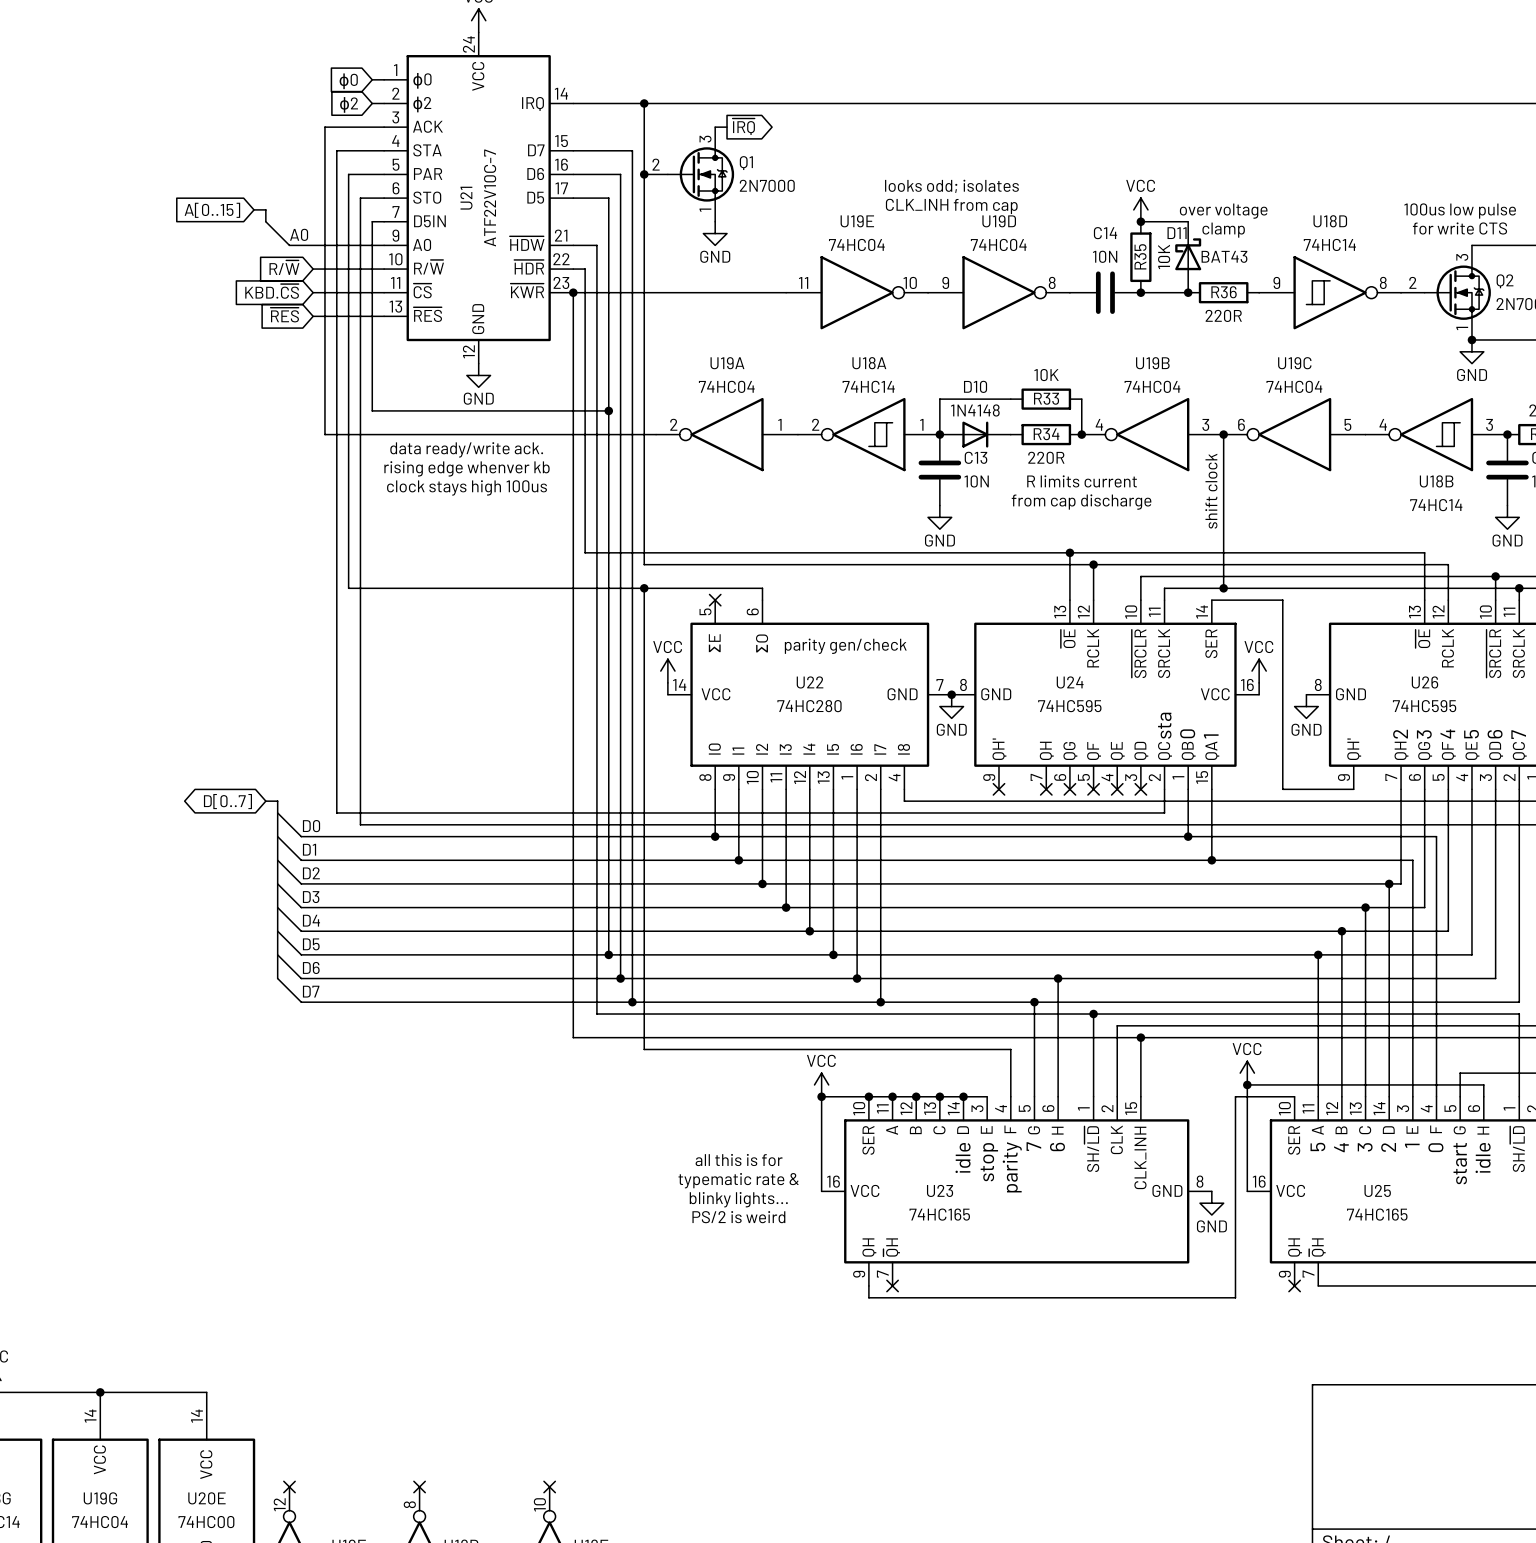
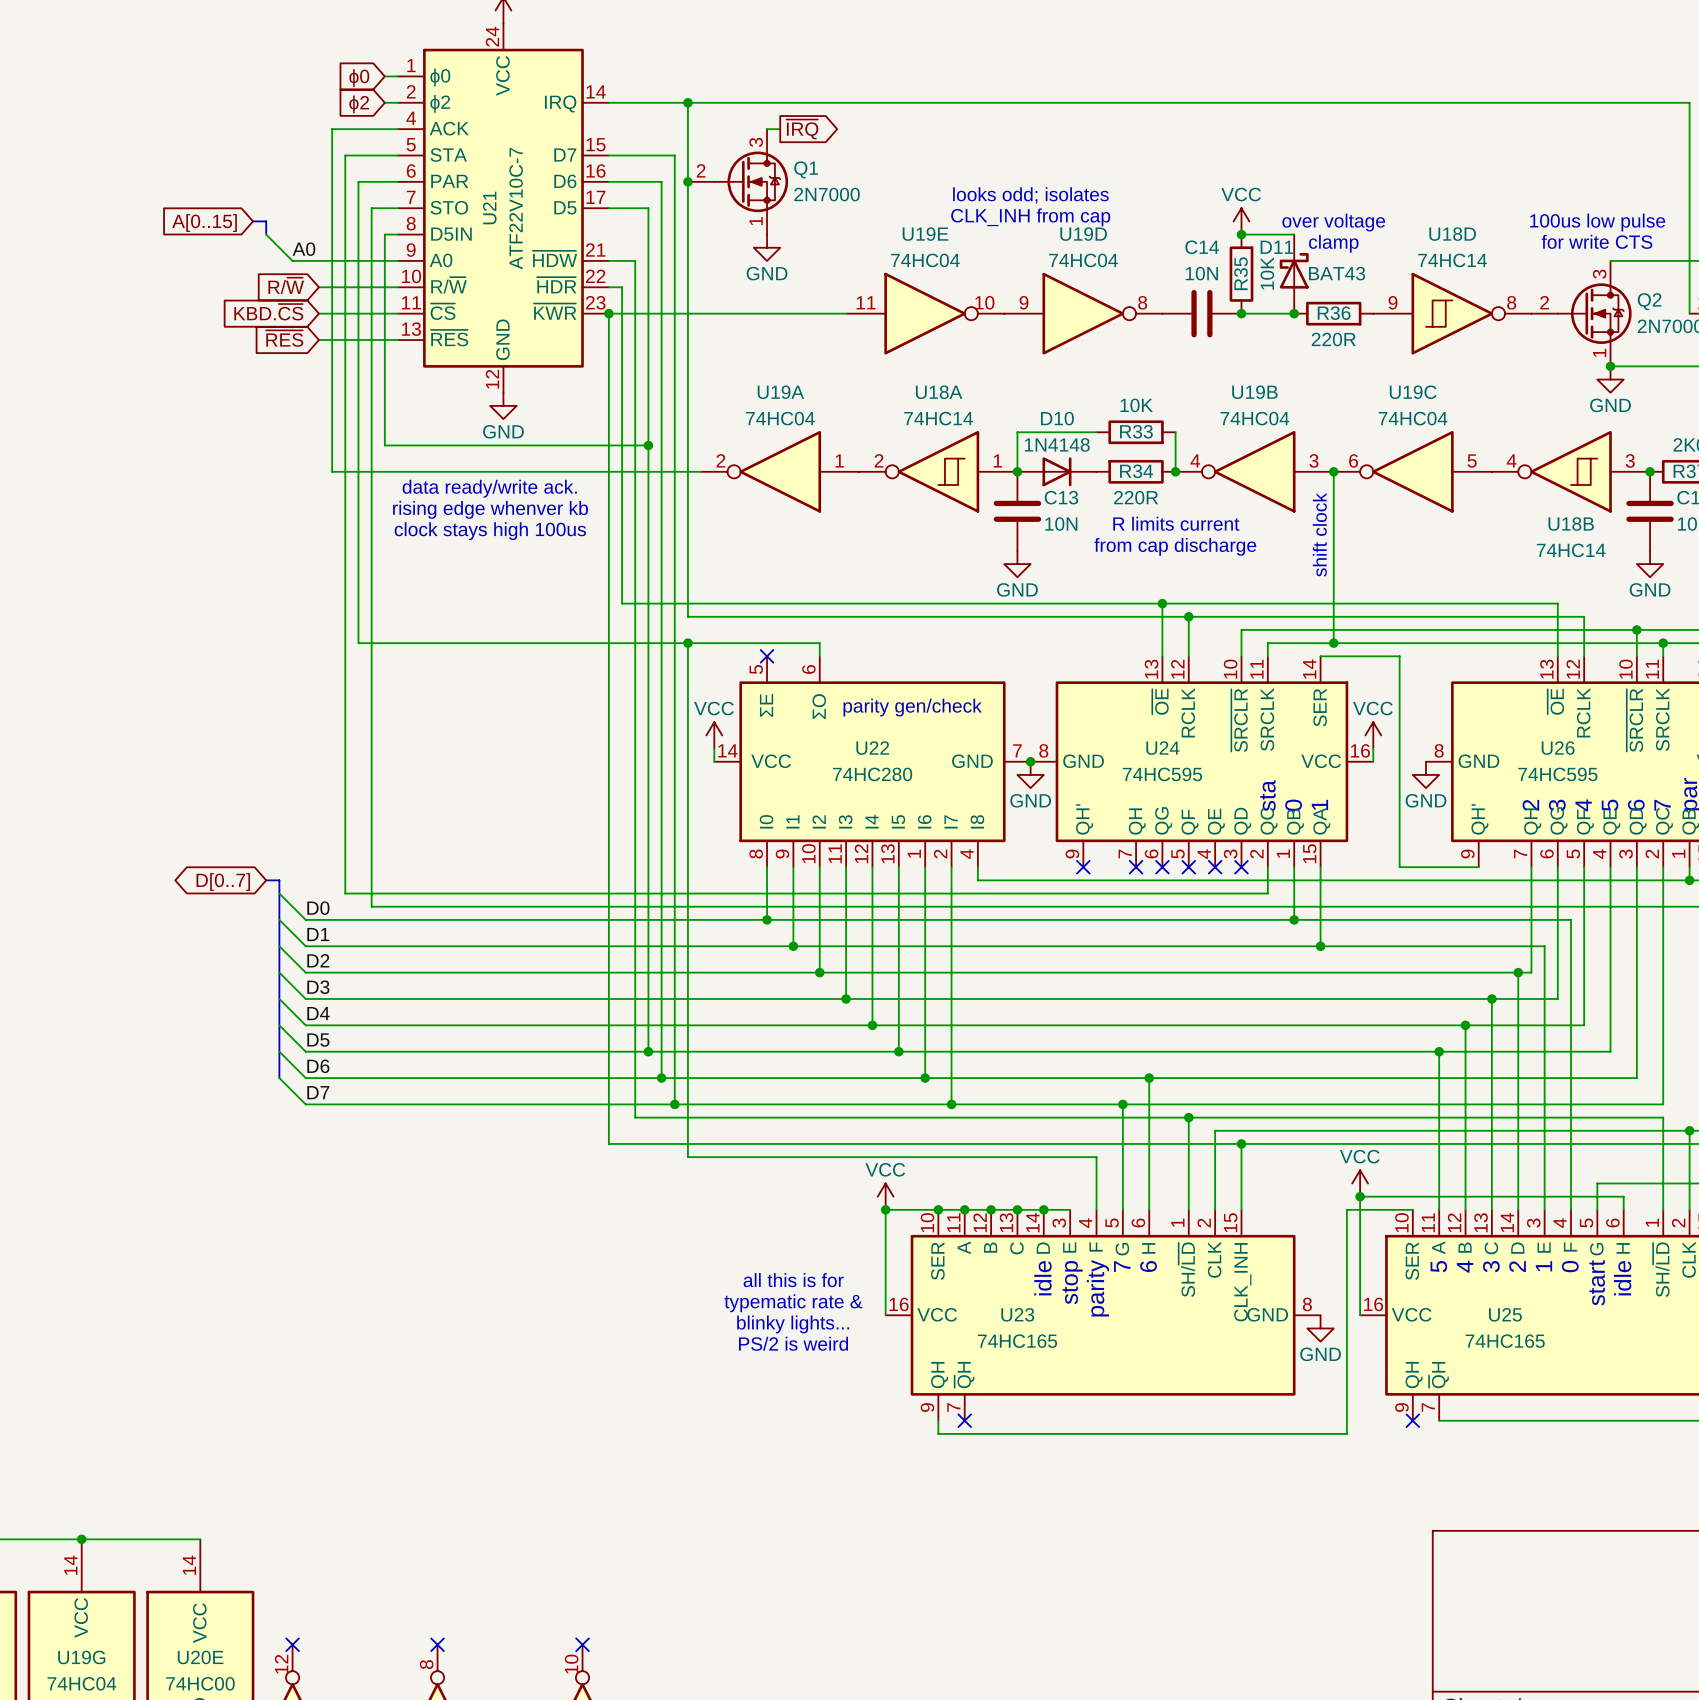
U21 pin number: 3 (395, 117) -> 4 (411, 118)
U21 pin number: 4 (395, 141) -> 5 (411, 144)
U21 pin number: 5 (396, 164) -> 6 (411, 170)
U21 pin number: 6 (396, 188) -> 7 (411, 197)
U21 pin number: 7 (396, 211) -> 8 (411, 223)

